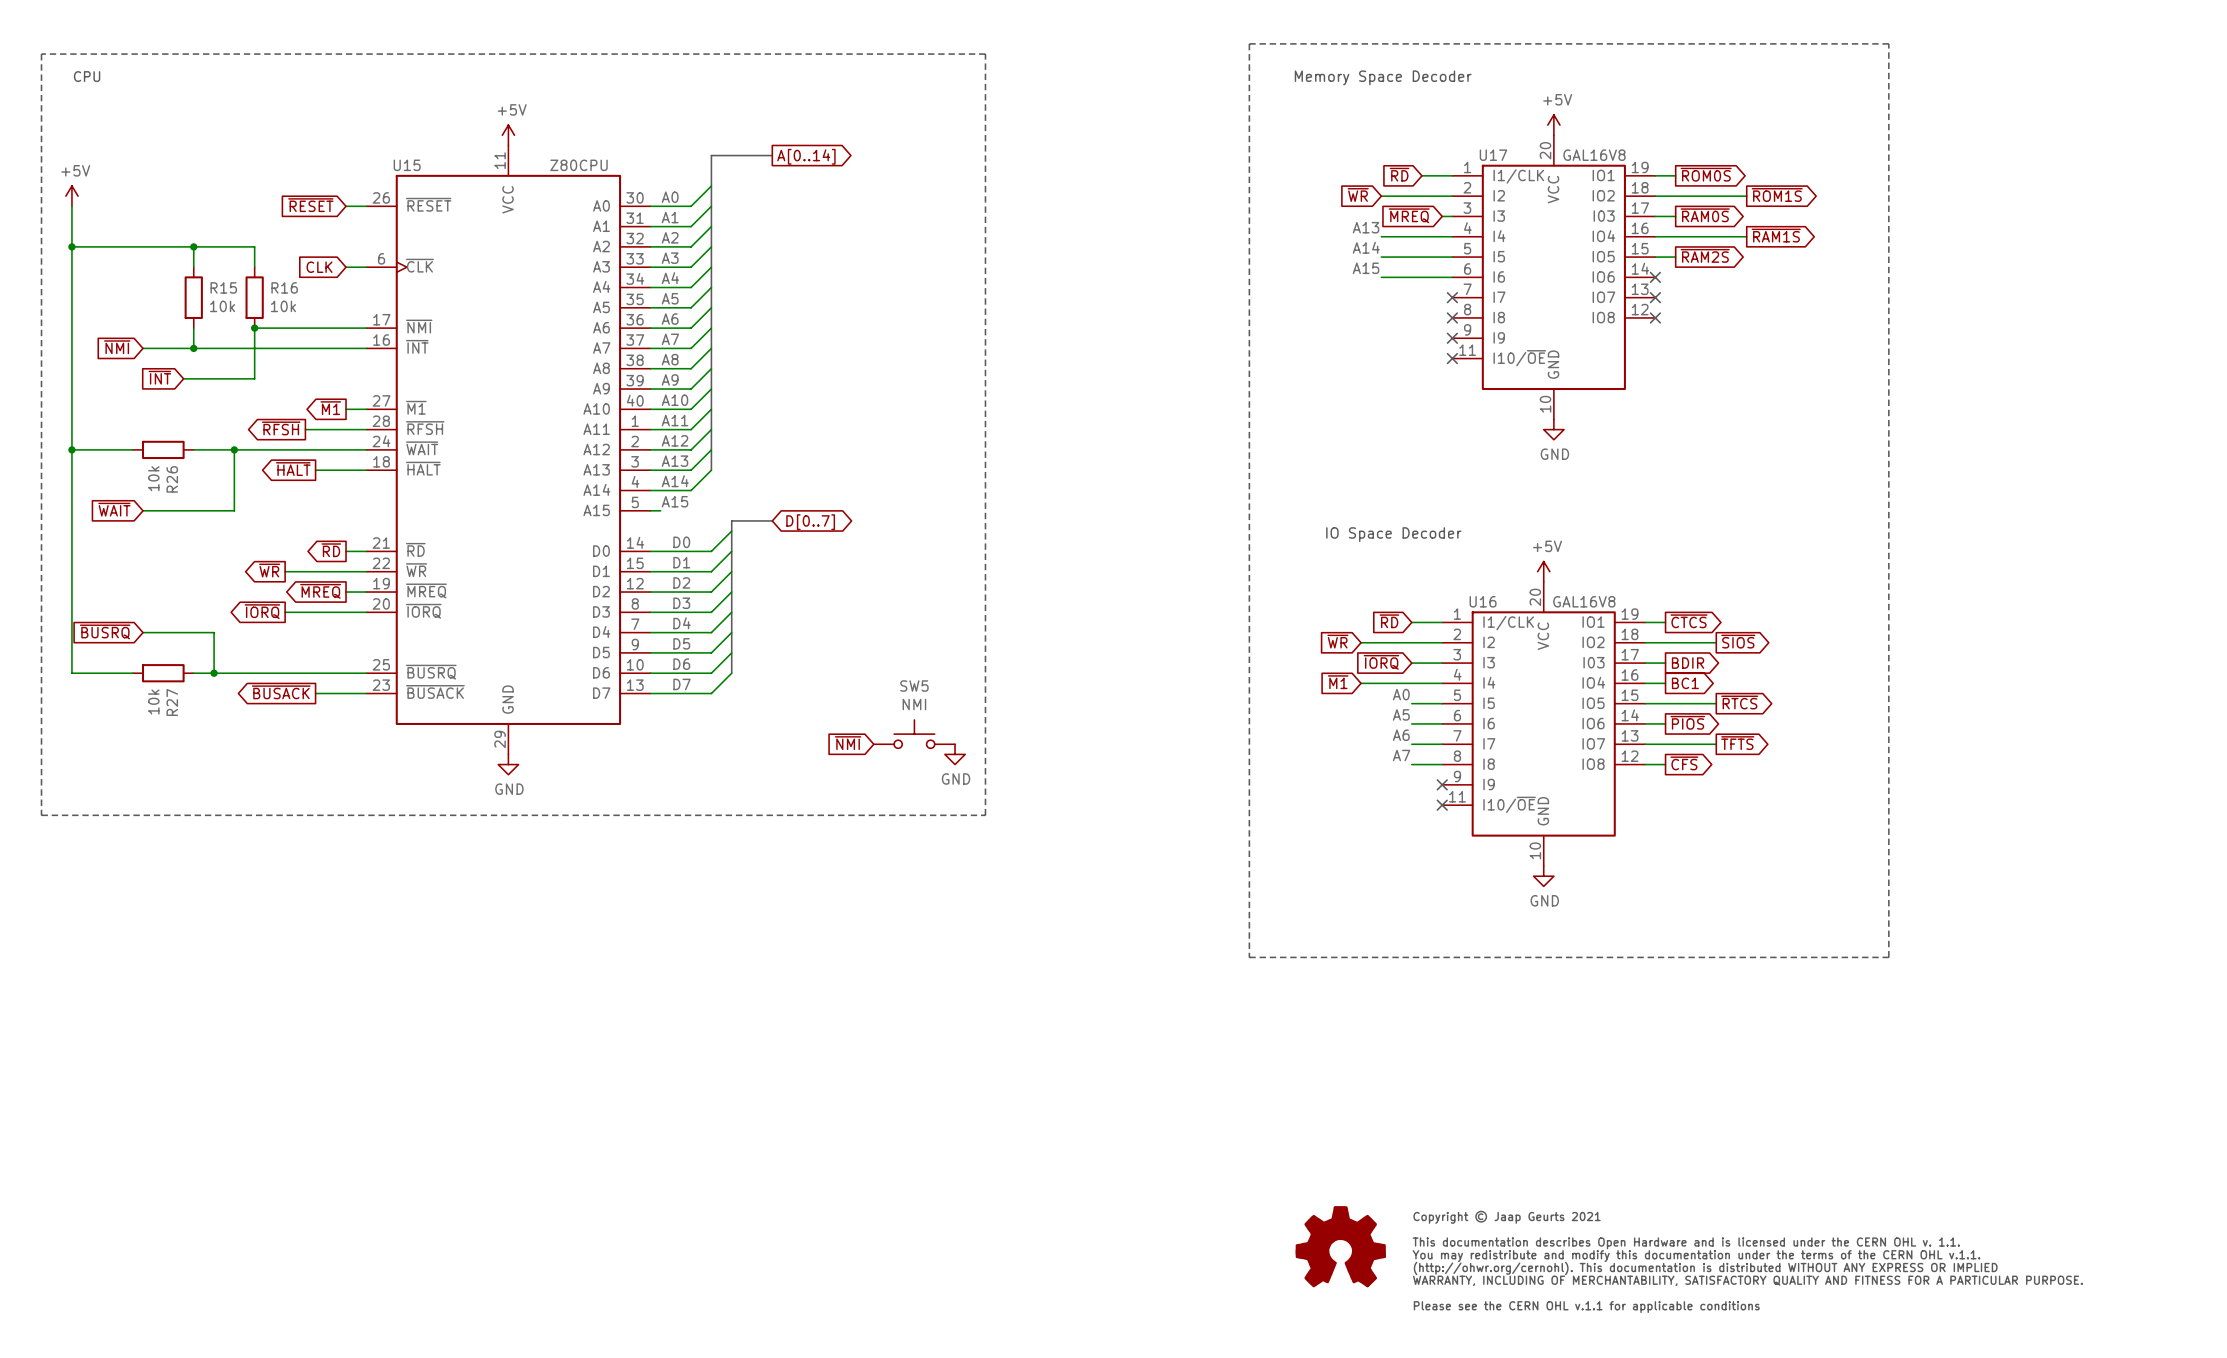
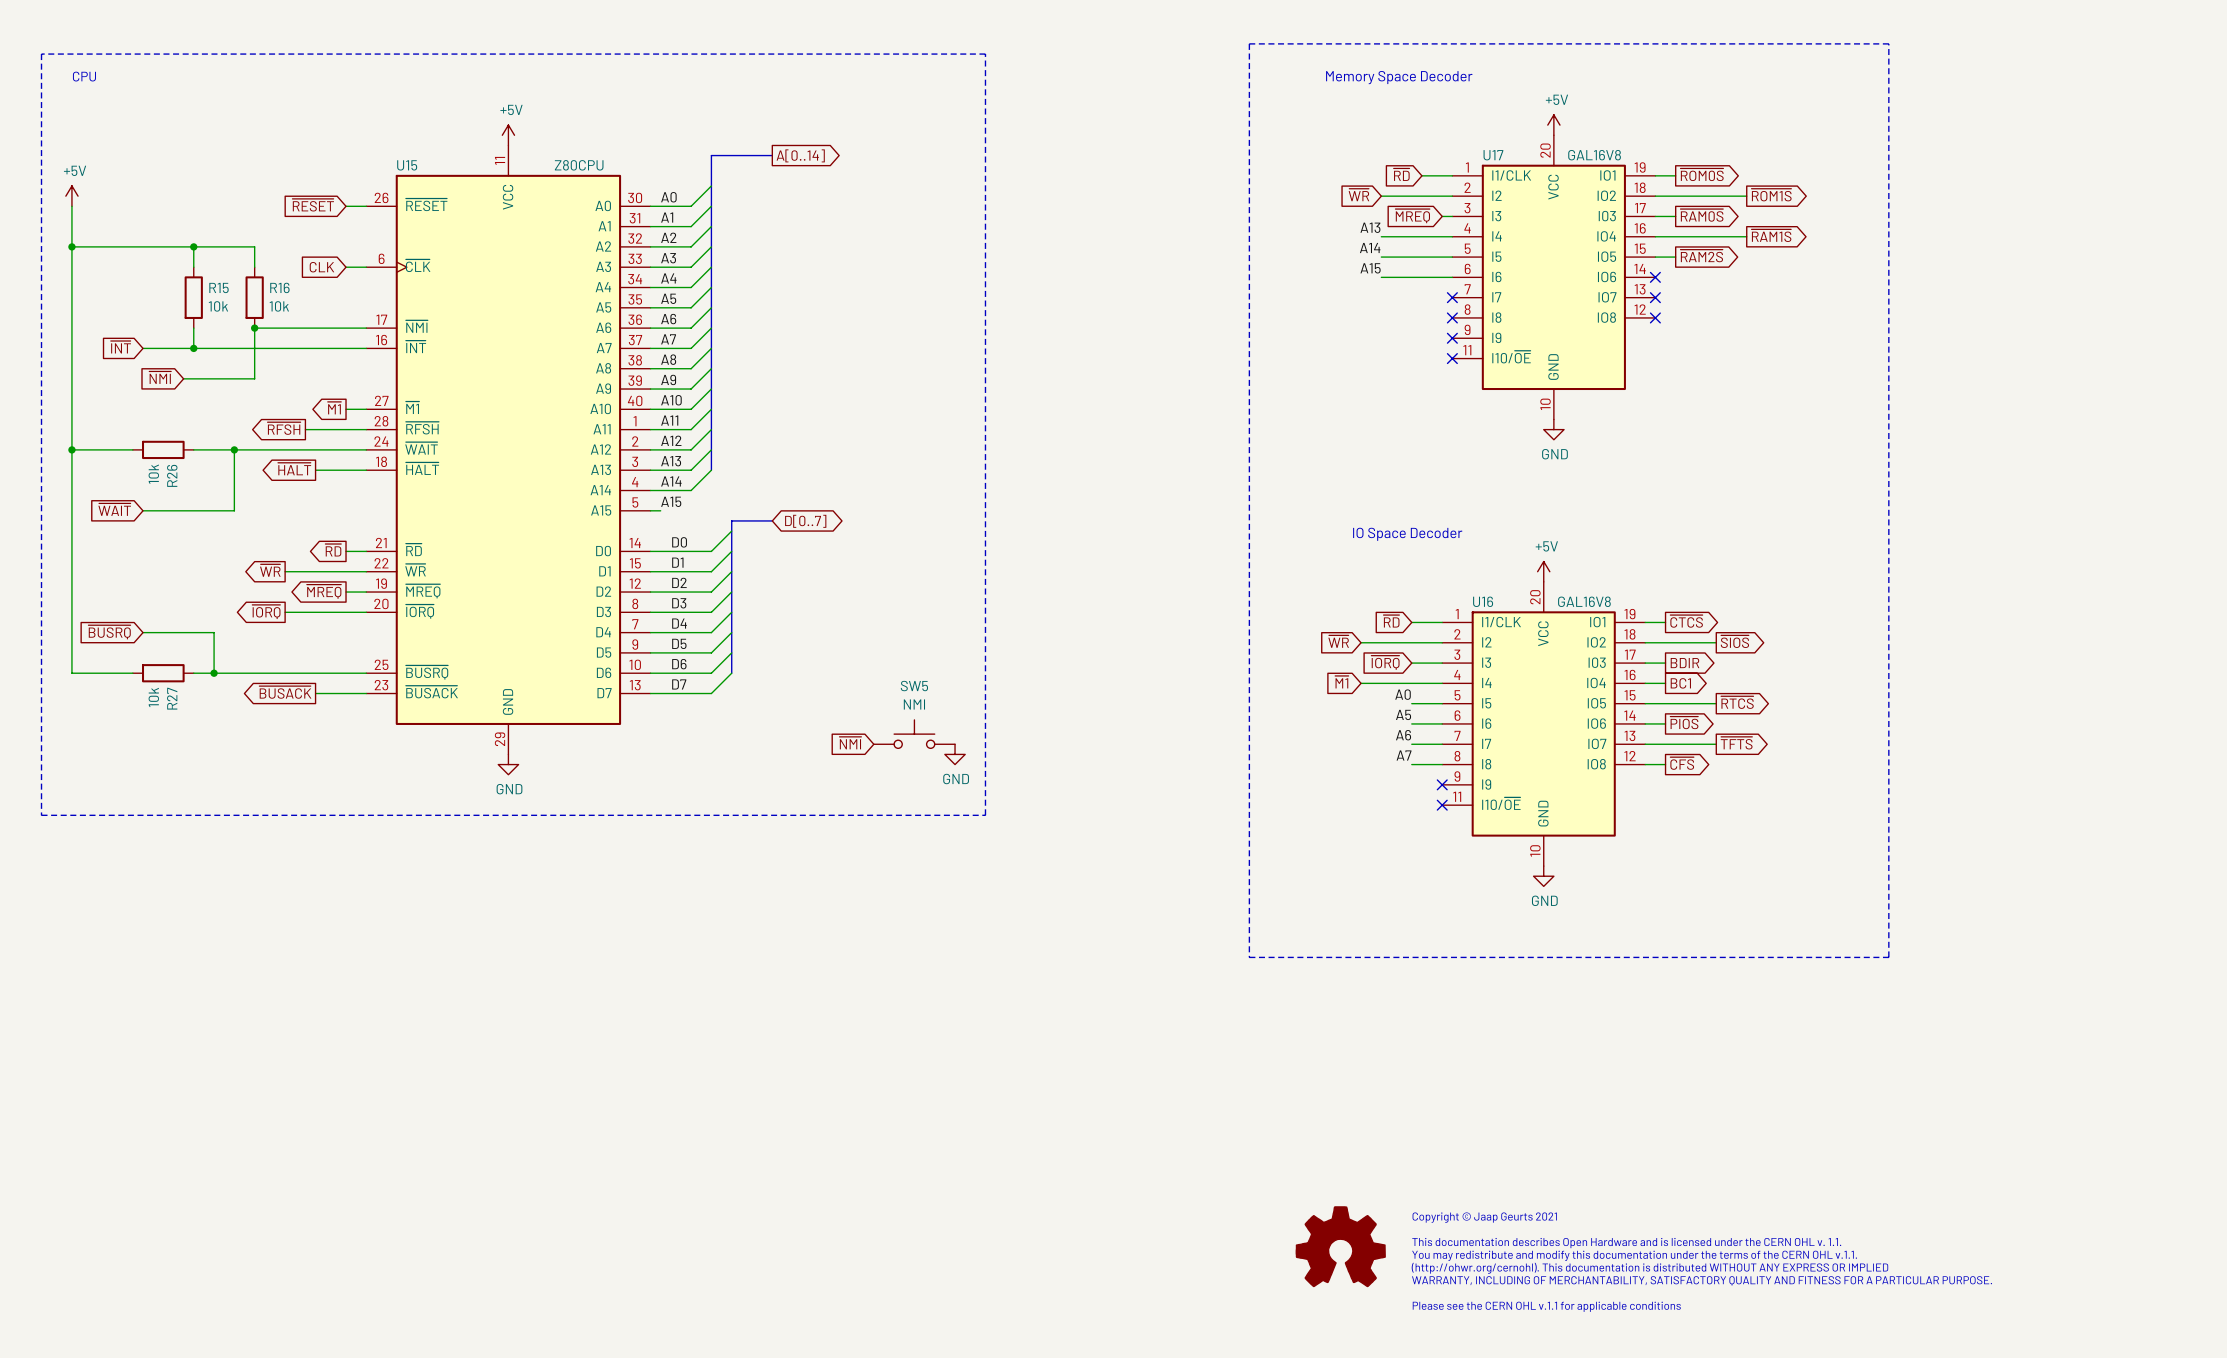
global label: ~{NMI} (117, 347) -> ~{INT} (120, 347)
global label: ~{INT} (159, 377) -> ~{NMI} (160, 377)

